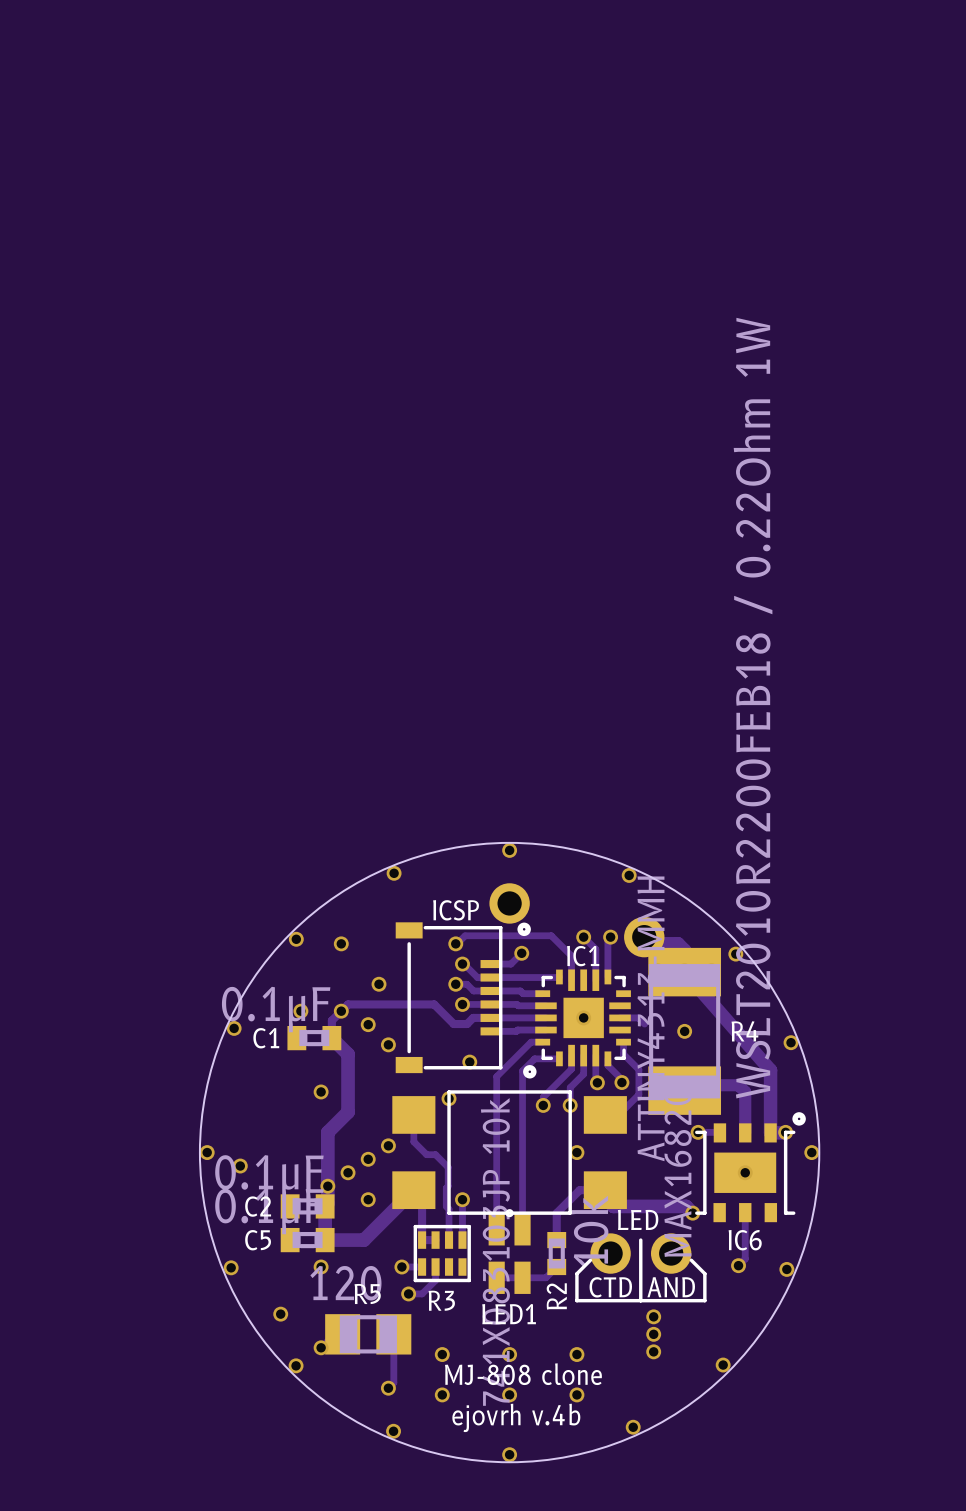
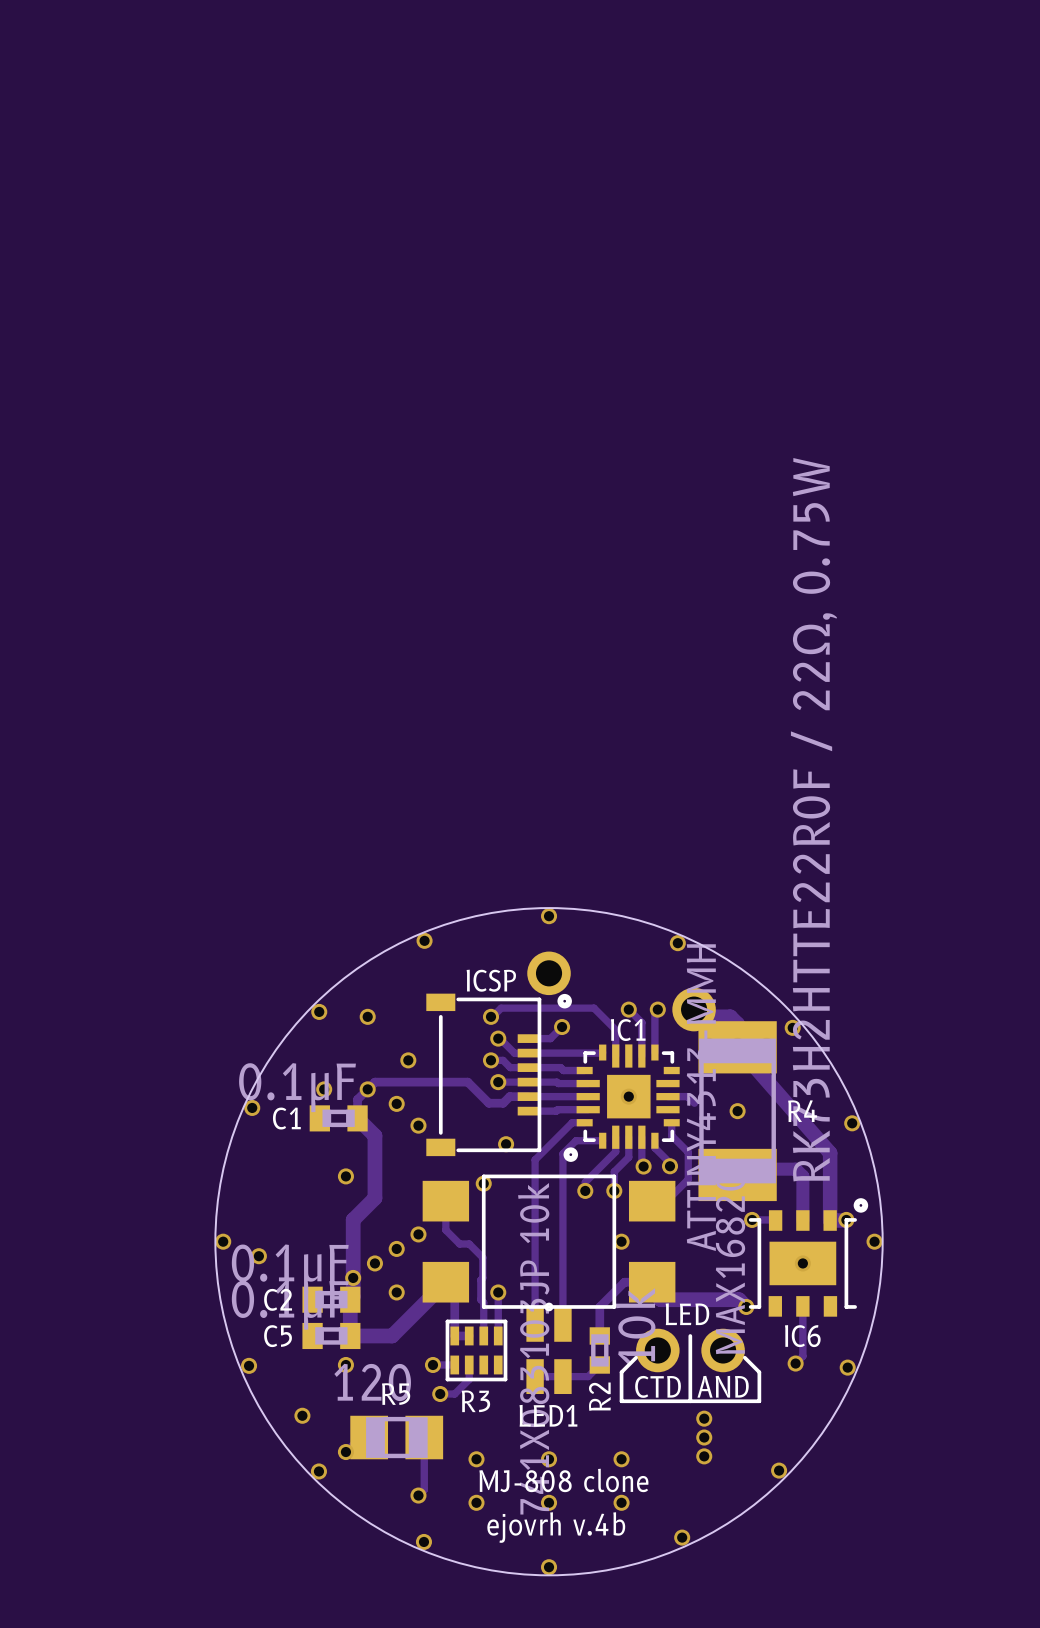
R4 value: WSLT2010R2200FEB18 / 0.22Ohm 1W (753, 708) -> RK73H2HTTE22R0F / 22Ω, 0.75W (813, 819)

